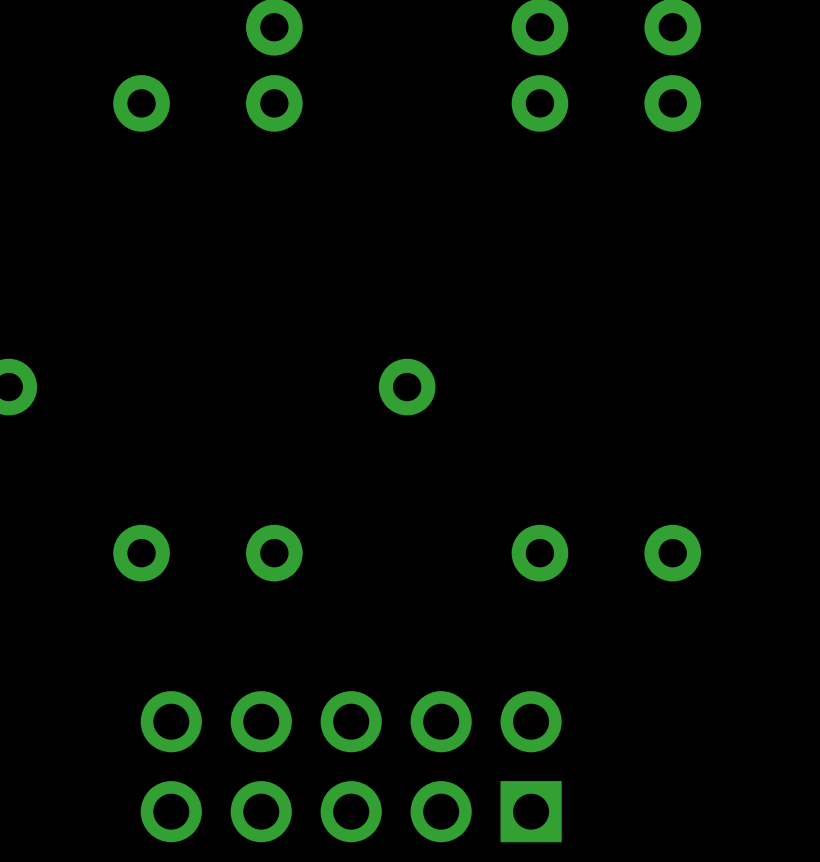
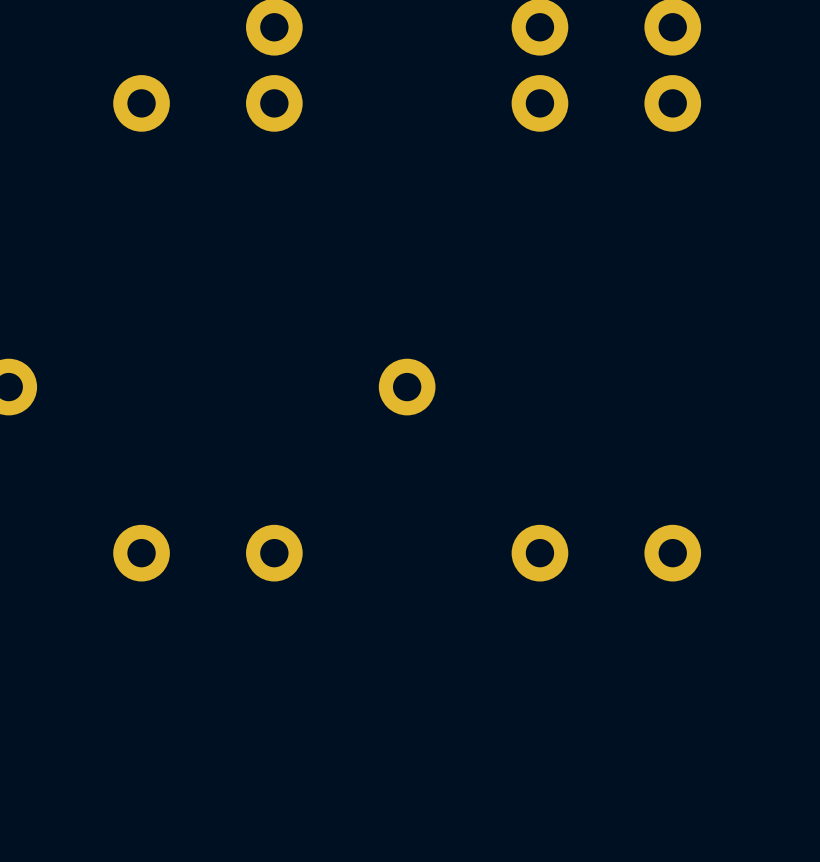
part: (351, 766) -> none

